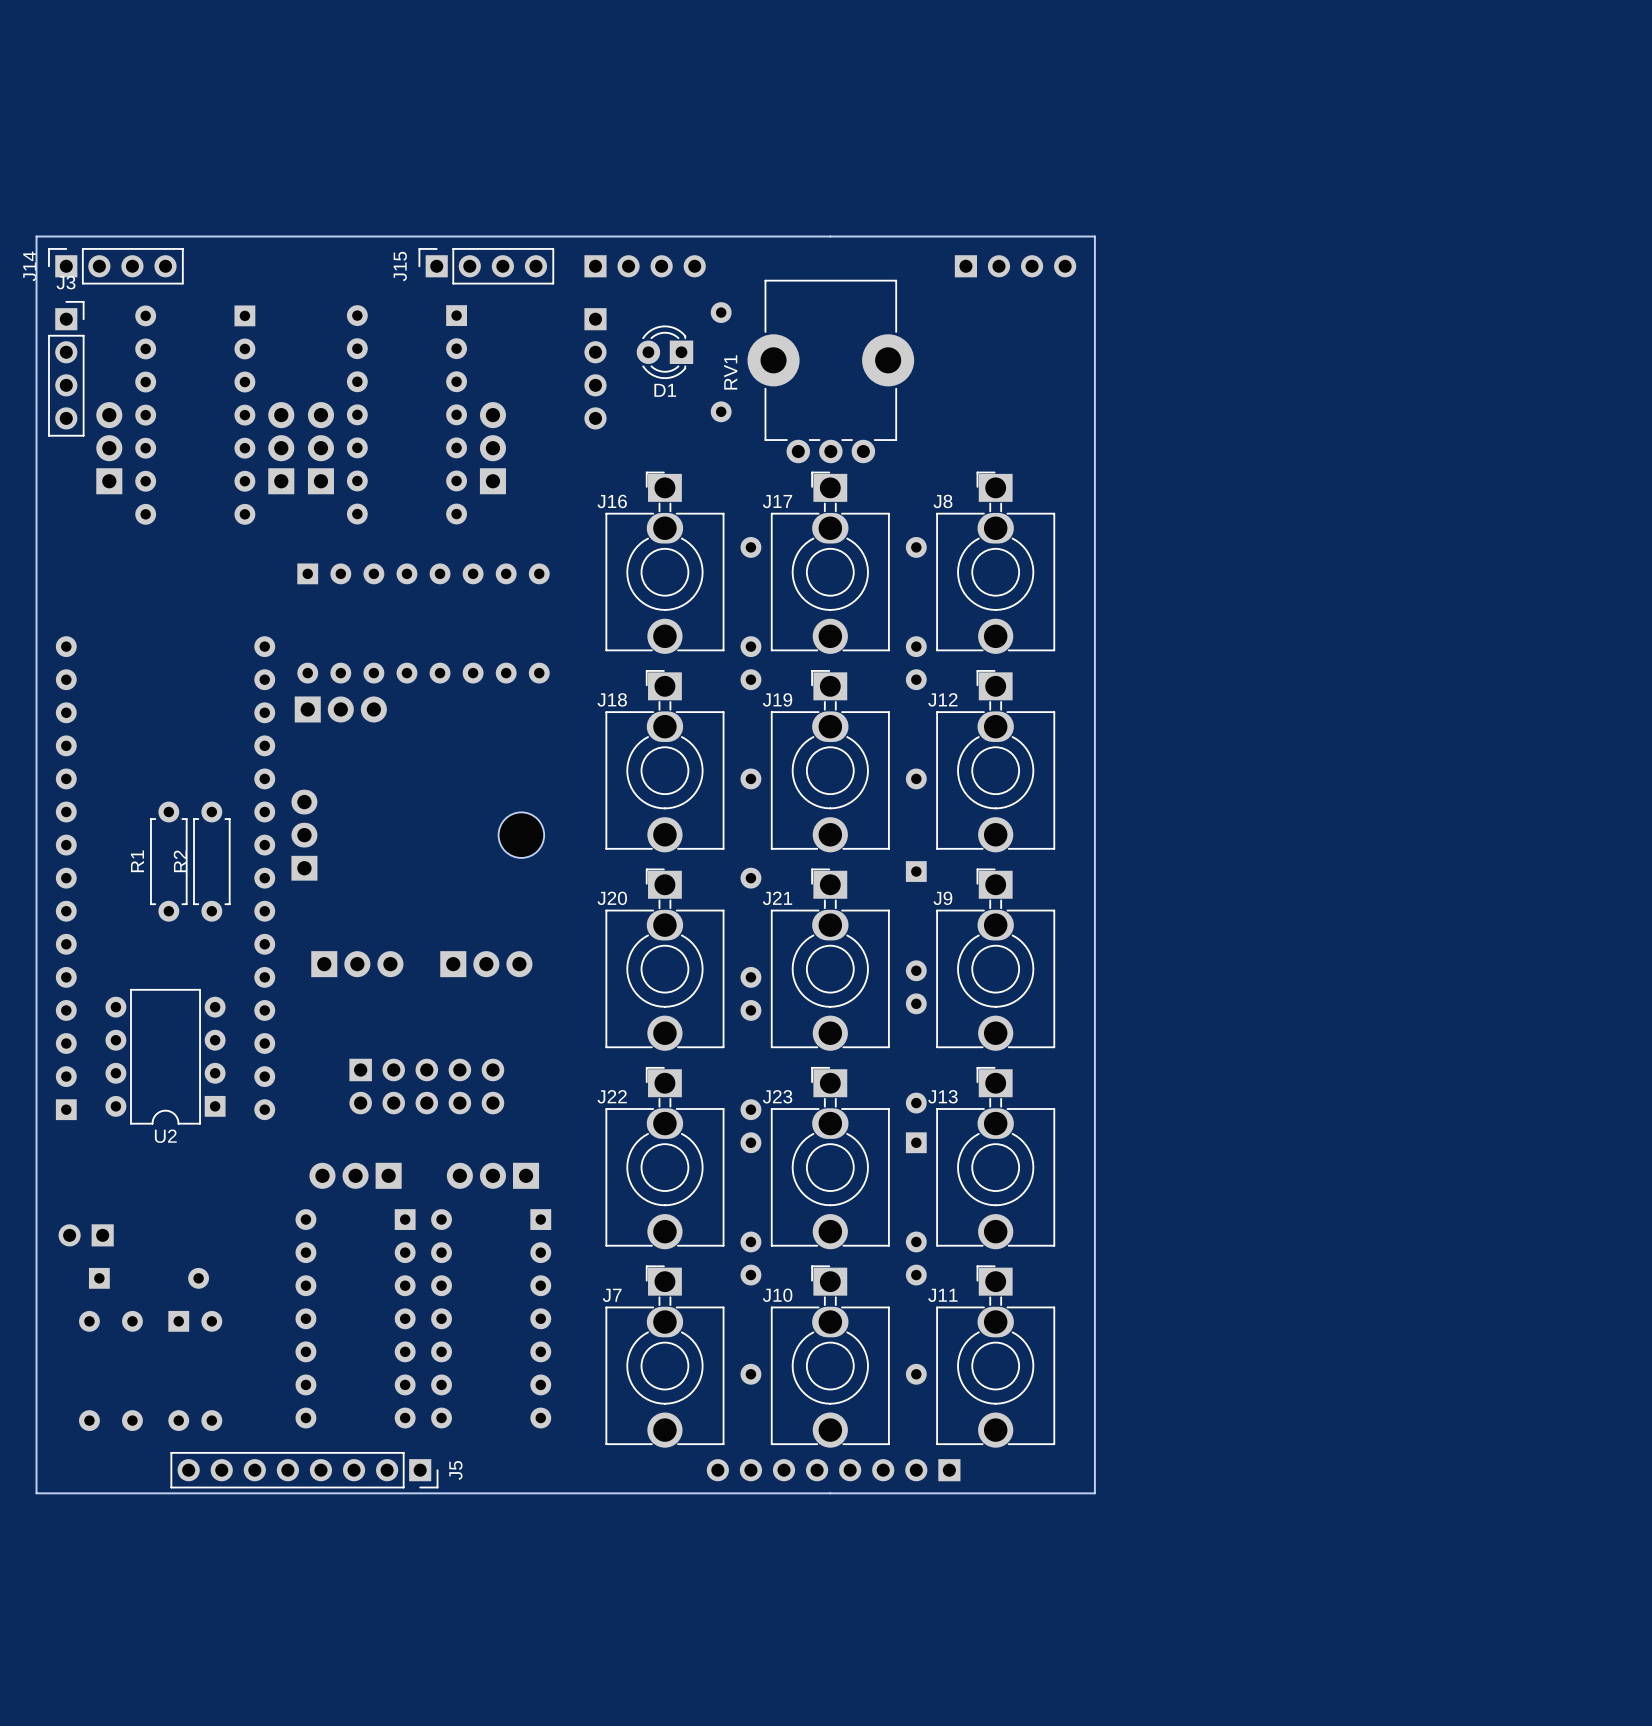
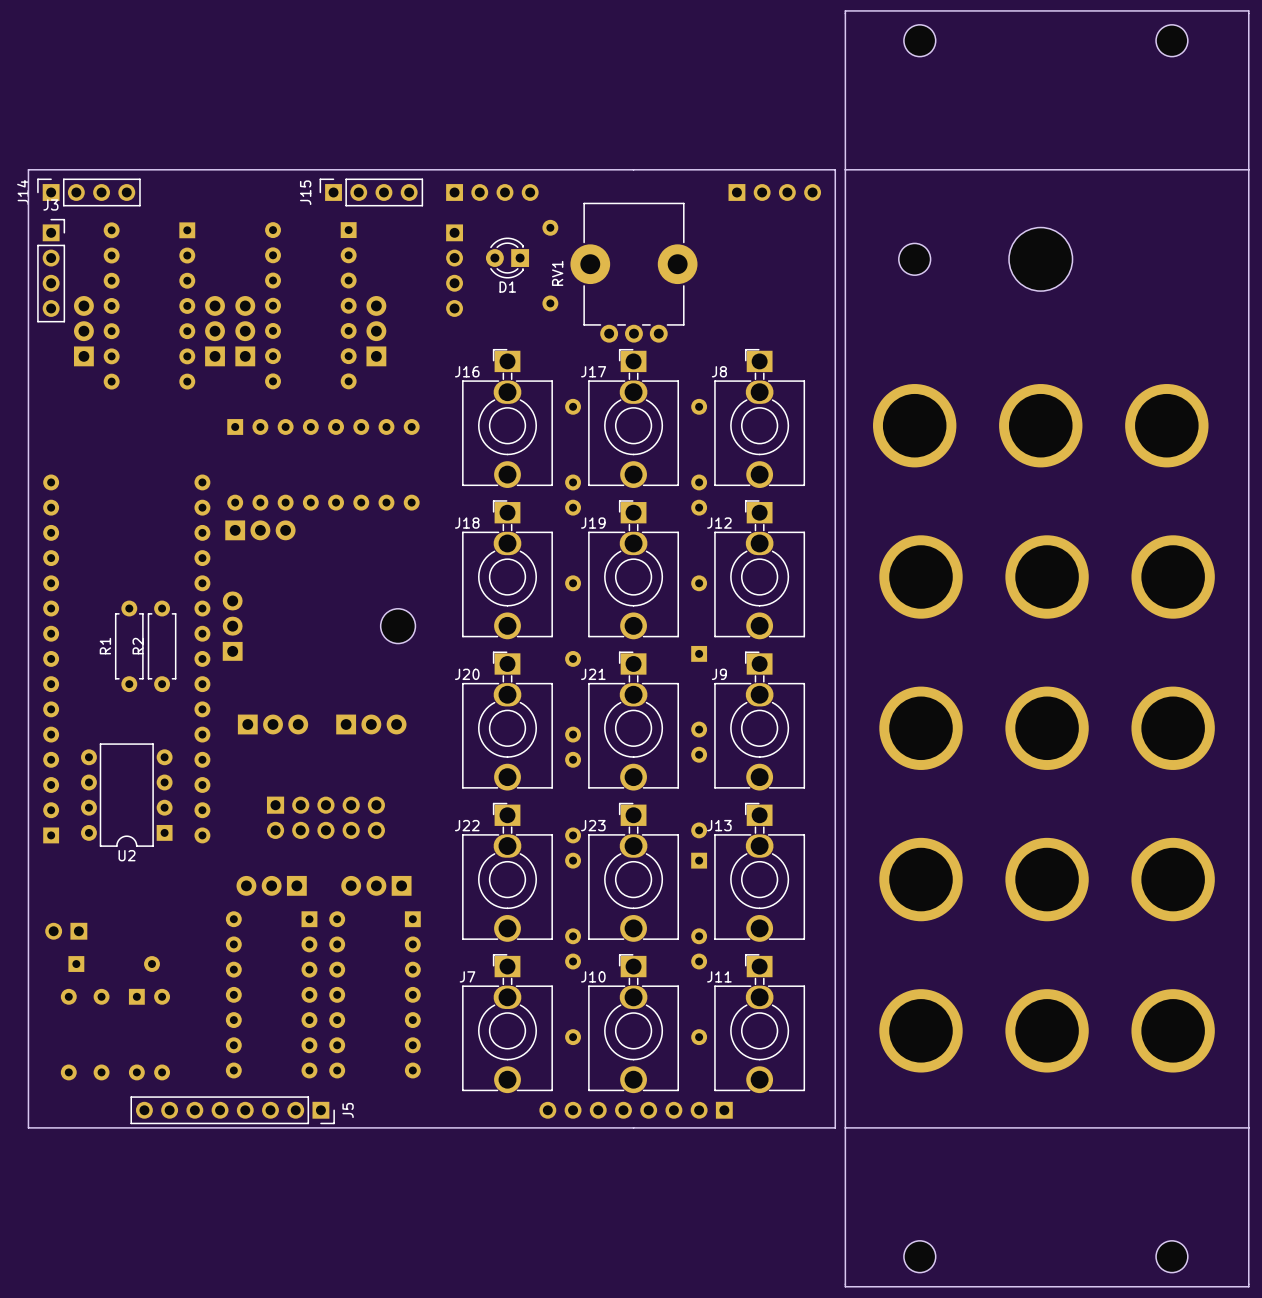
board edge: none -> (845, 10) (845, 1286) (1248, 1286) (1248, 10) (845, 10)
part: none -> (919, 40)
part: none -> (1171, 40)
board edge: none -> (845, 169) (1248, 169)
part: none -> (914, 259)
part: none -> (1040, 259)
part: none -> (914, 425)
part: none -> (1040, 425)
part: none -> (1166, 425)
part: none -> (921, 576)
part: none -> (1047, 576)
part: none -> (1173, 576)
part: none -> (921, 728)
part: none -> (1047, 728)
part: none -> (1173, 728)
part: none -> (921, 879)
part: none -> (1047, 879)
part: none -> (1173, 879)
part: none -> (921, 1030)
part: none -> (1047, 1030)
part: none -> (1173, 1030)
board edge: none -> (845, 1127) (1248, 1127)
part: none -> (919, 1256)
part: none -> (1171, 1256)

